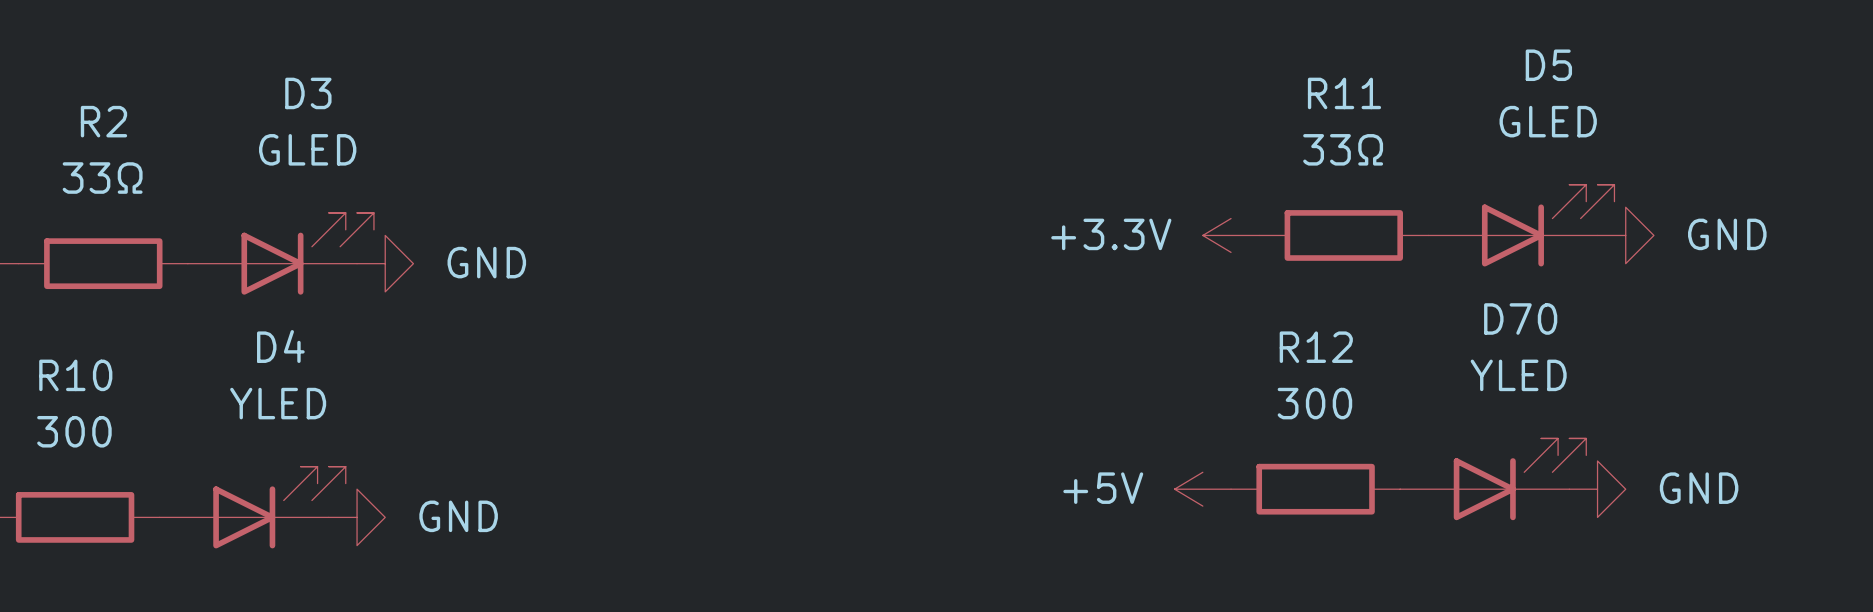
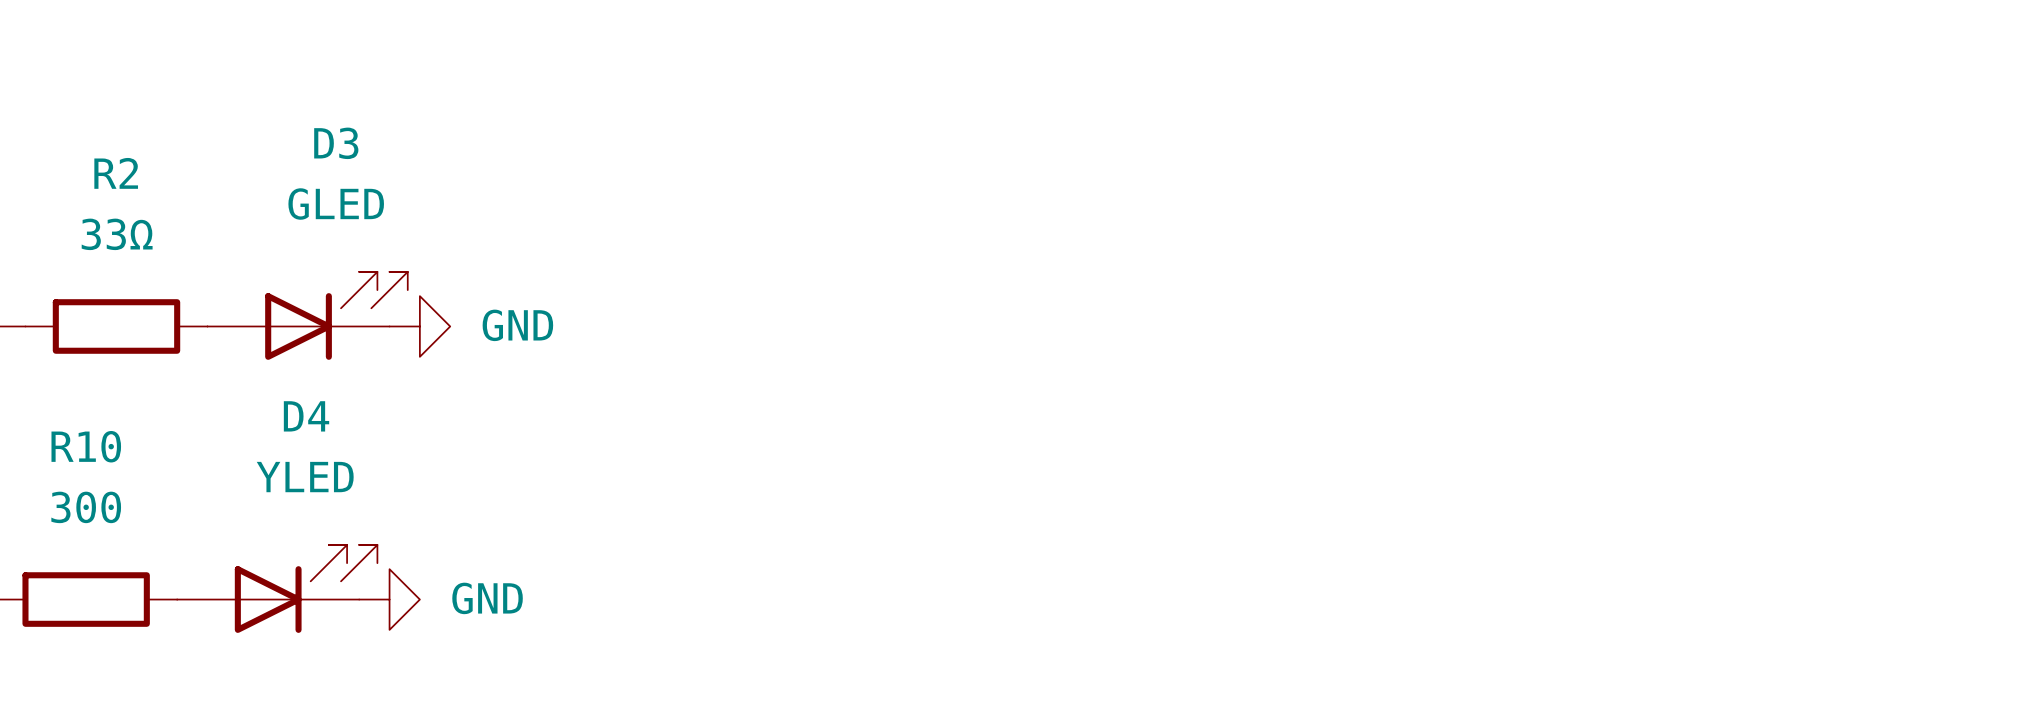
D5: GLED (1521, 225) -> none
power symbol: +3.3V (1231, 235) -> none
R11: 33Ω (1343, 235) -> none
power symbol: GND (1625, 235) -> none
D70: YLED (1493, 479) -> none
power symbol: +5V (1202, 489) -> none
R12: 300 (1315, 489) -> none
power symbol: GND (1597, 489) -> none

